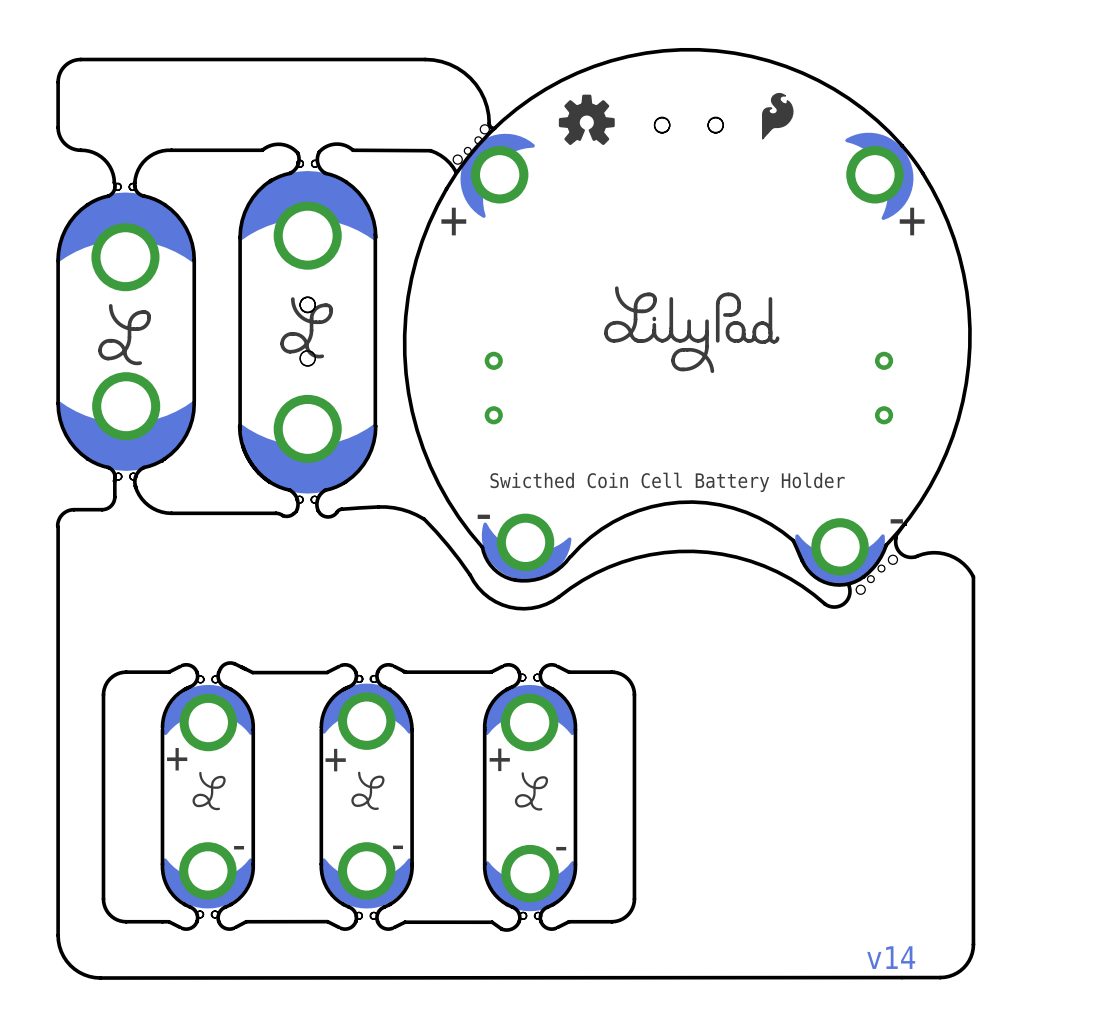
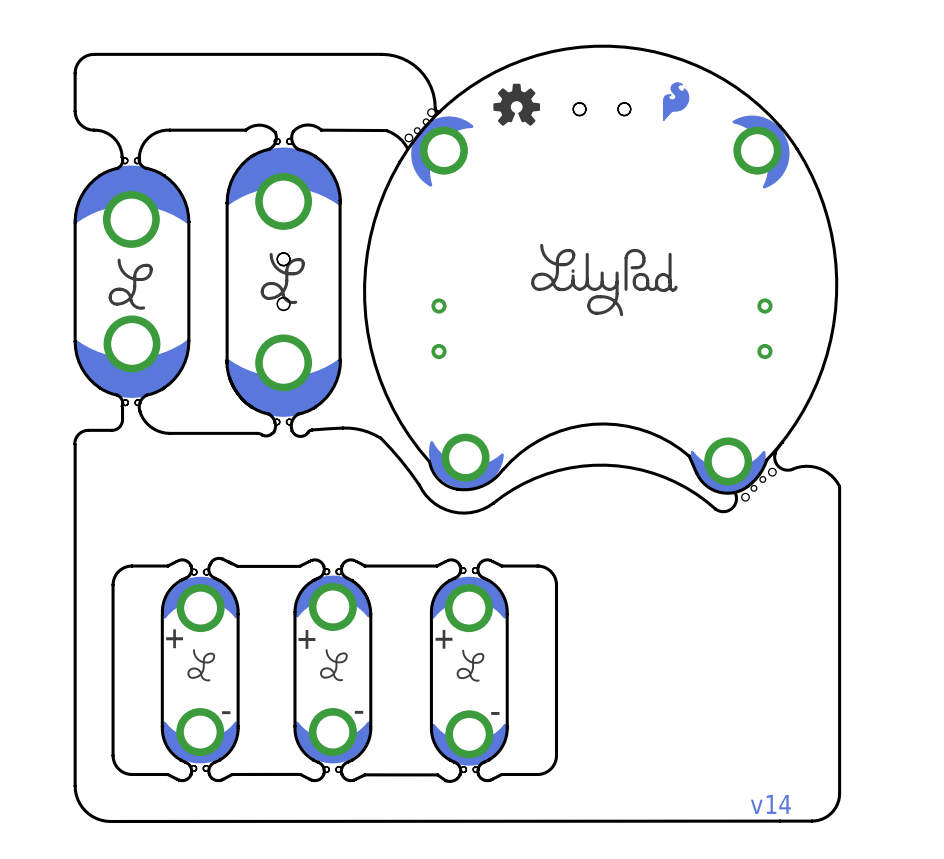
drawing shape: [762, 92, 794, 140] -> [663, 82, 690, 122]
text: + (453, 221) -> none
text: + (912, 221) -> none
text: Swicthed Coin Cell Battery Holder (667, 482) -> none
text: - (483, 516) -> none
text: - (896, 521) -> none

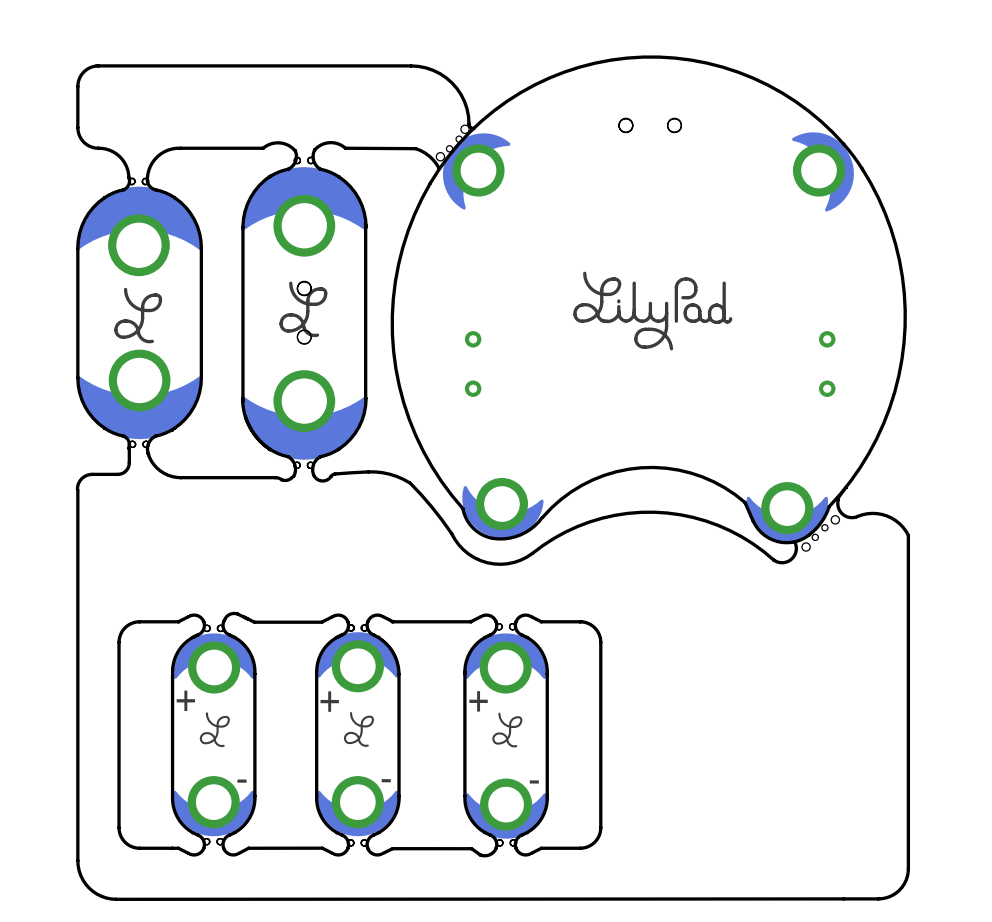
drawing: [663, 82, 690, 122] -> none
drawing: [493, 83, 541, 126] -> none
text: v14 (770, 804) -> none

